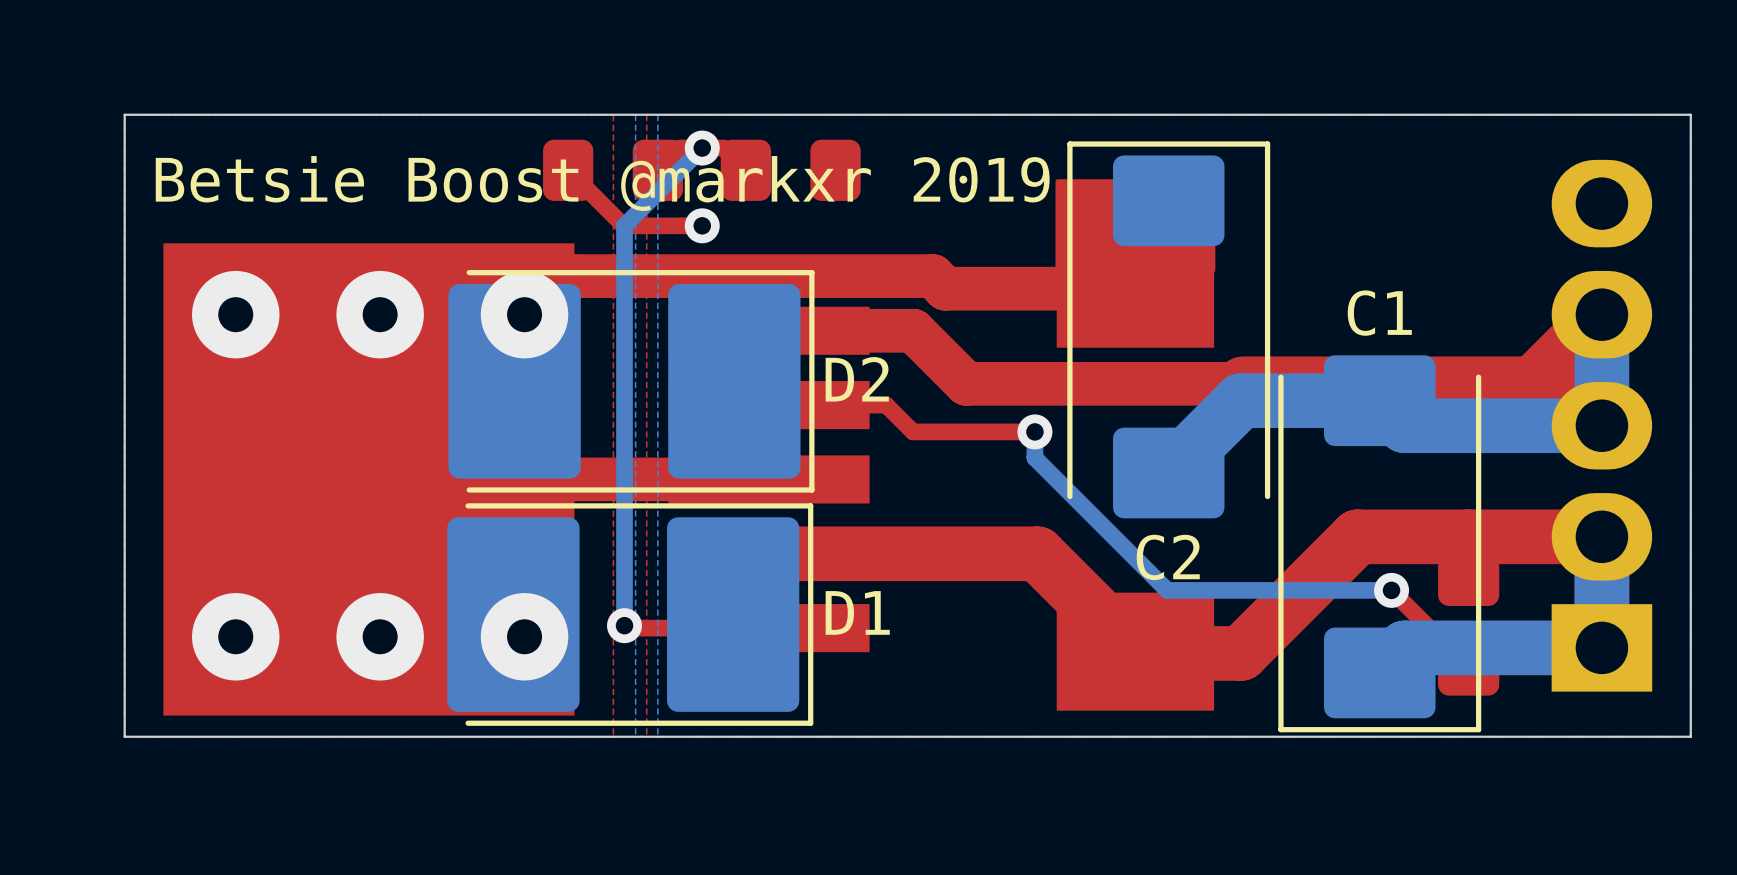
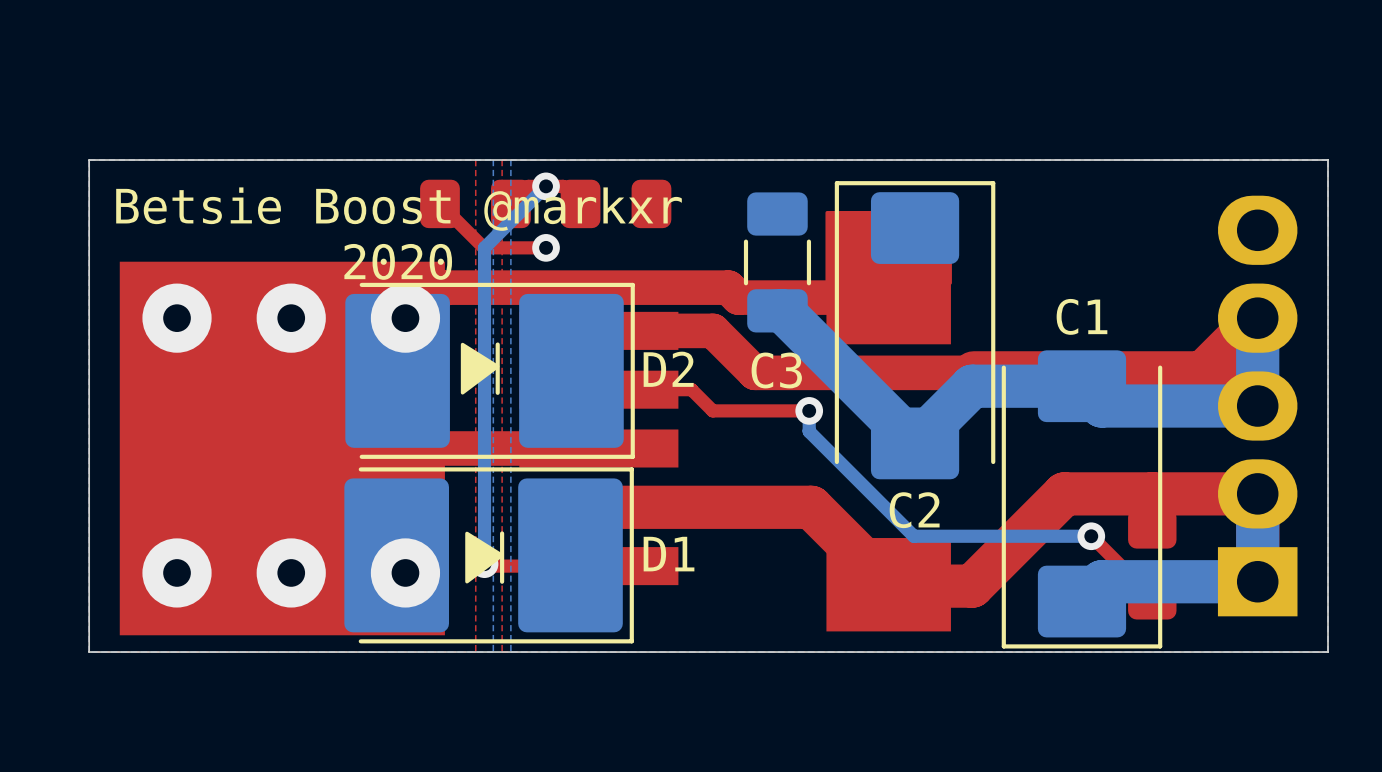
text: Betsie Boost @markxr 2019 (602, 183) -> Betsie Boost @markxr (399, 209)
text: none -> 2020 (398, 261)
C3: none -> (777, 262)
bottom track: none -> (777, 310) (782, 310) (915, 443)
drawing: none -> [460, 342, 500, 395]
line: none -> (497, 344) (497, 392)
drawing: none -> [465, 531, 504, 584]
line: none -> (502, 533) (502, 581)

